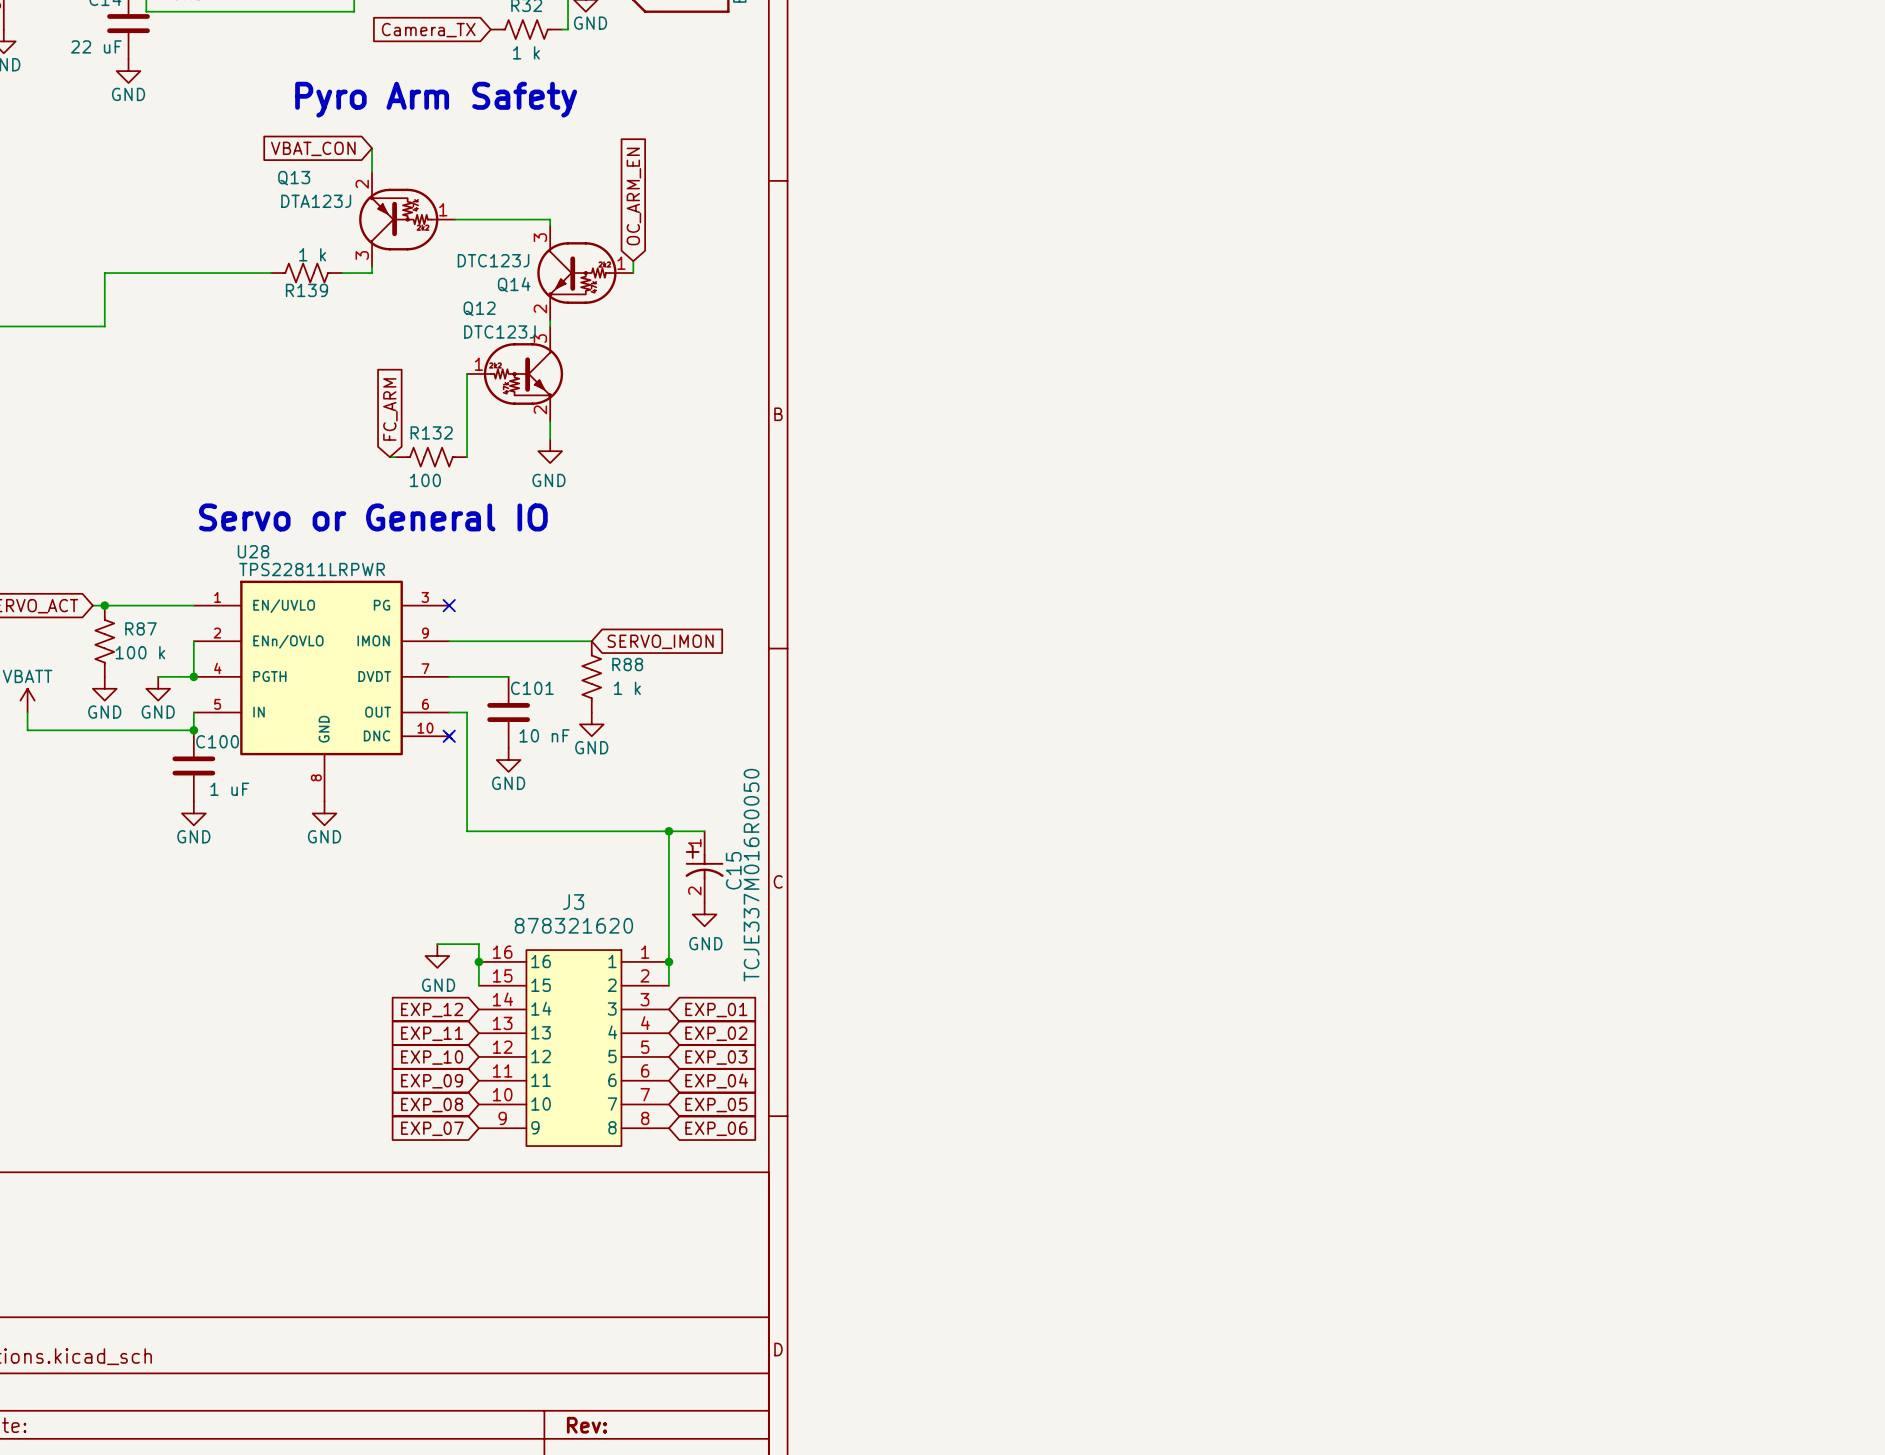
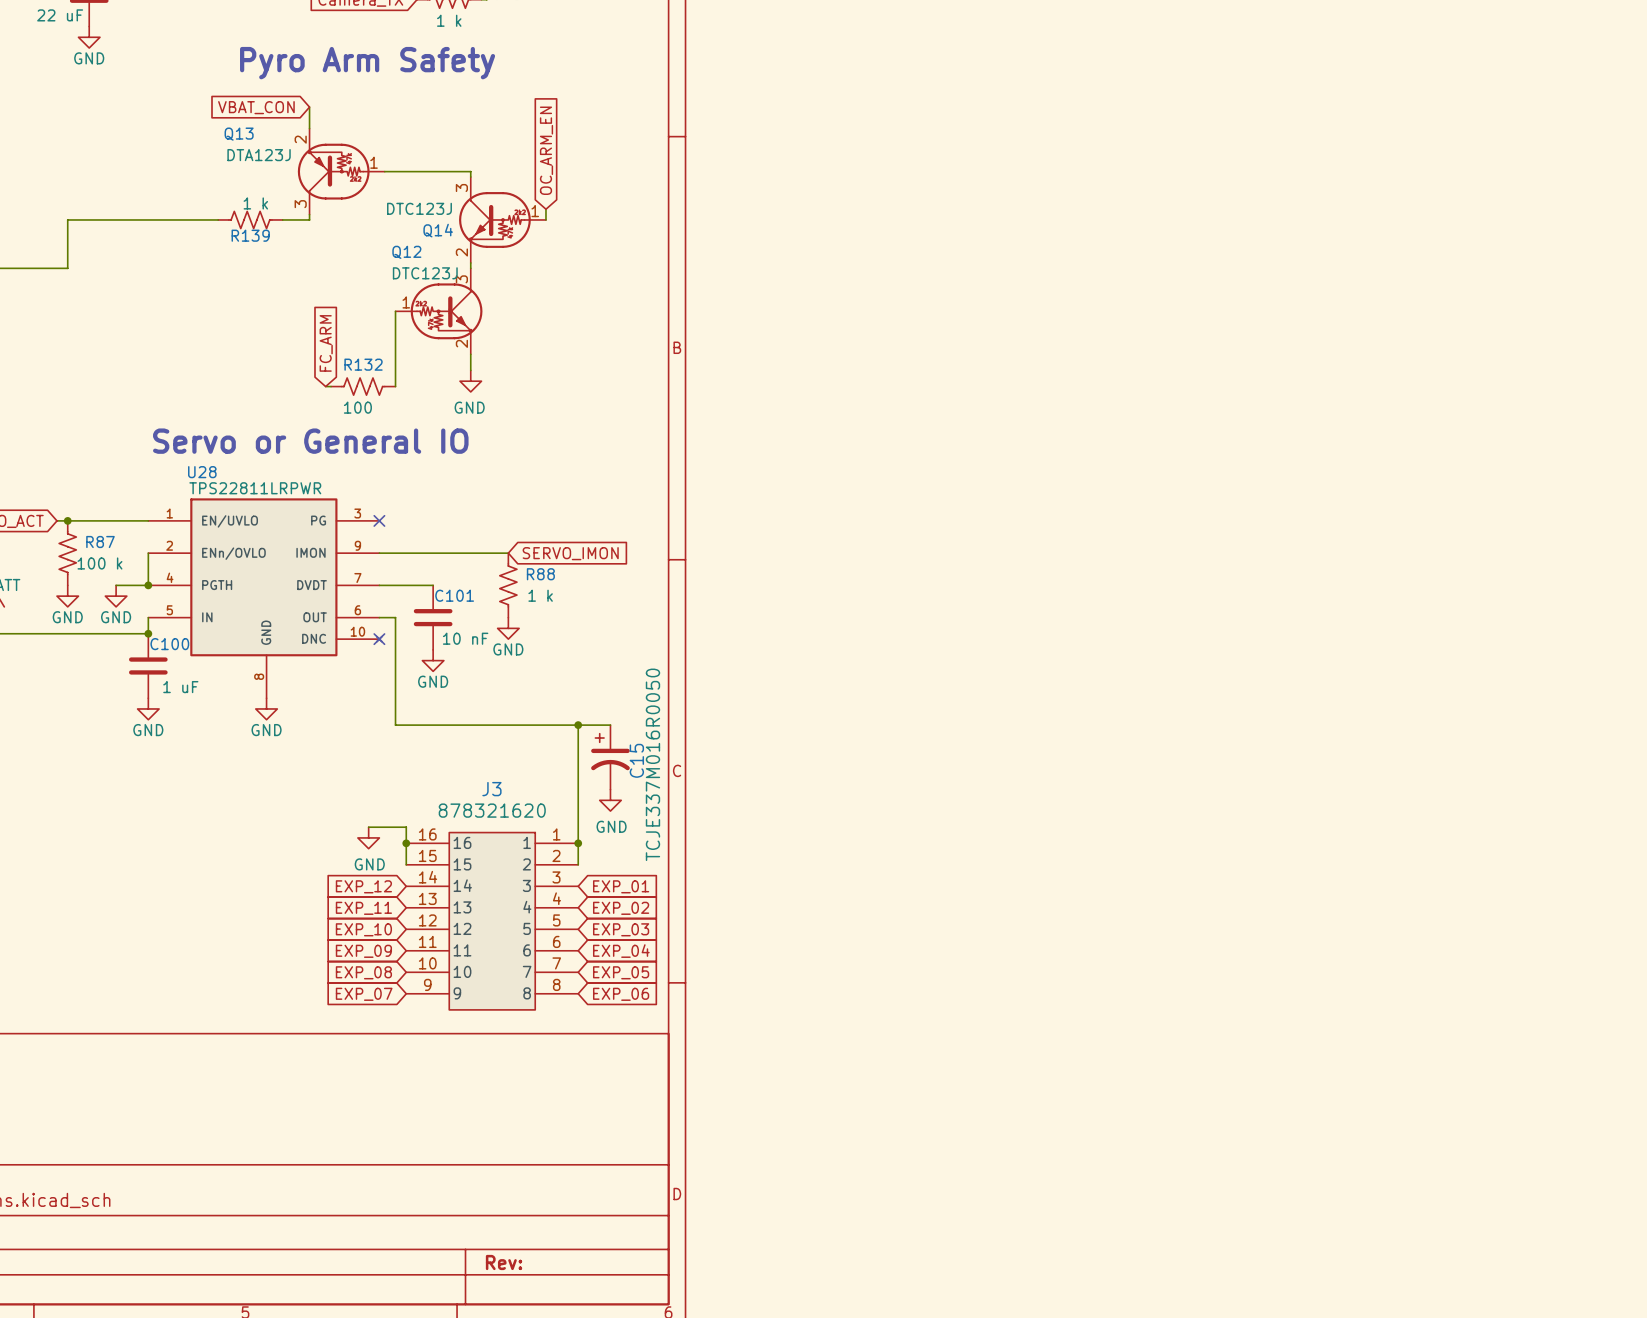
C15 symbol: [685, 831, 724, 903] -> [591, 725, 630, 790]

